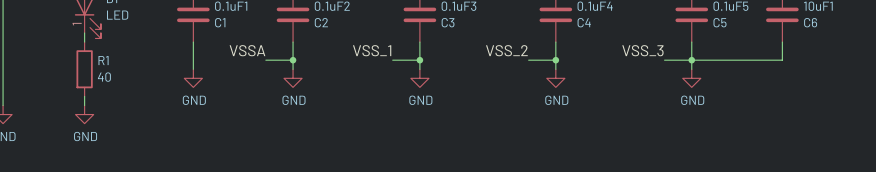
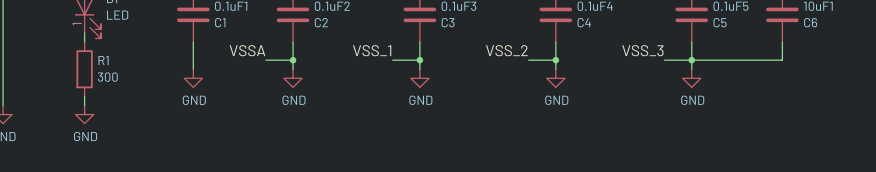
R1 value: 40 (104, 77) -> 300 (107, 77)

